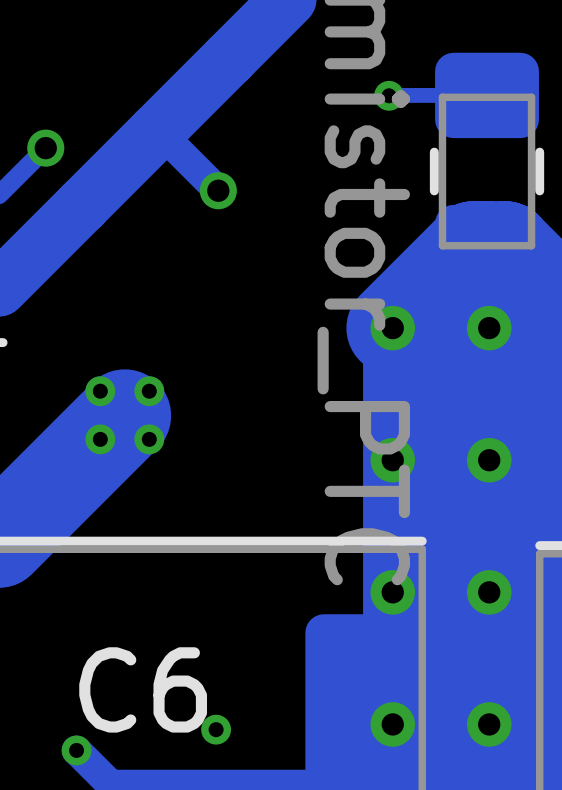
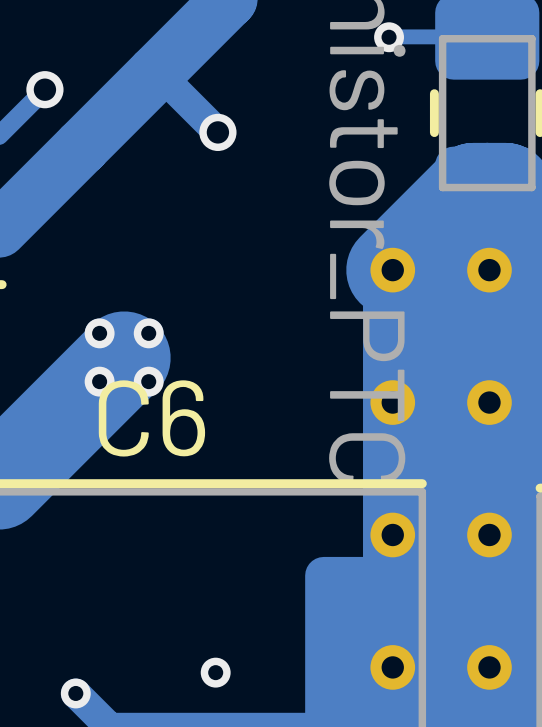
C6 name position: C6 (143, 689) -> C6 (151, 418)

